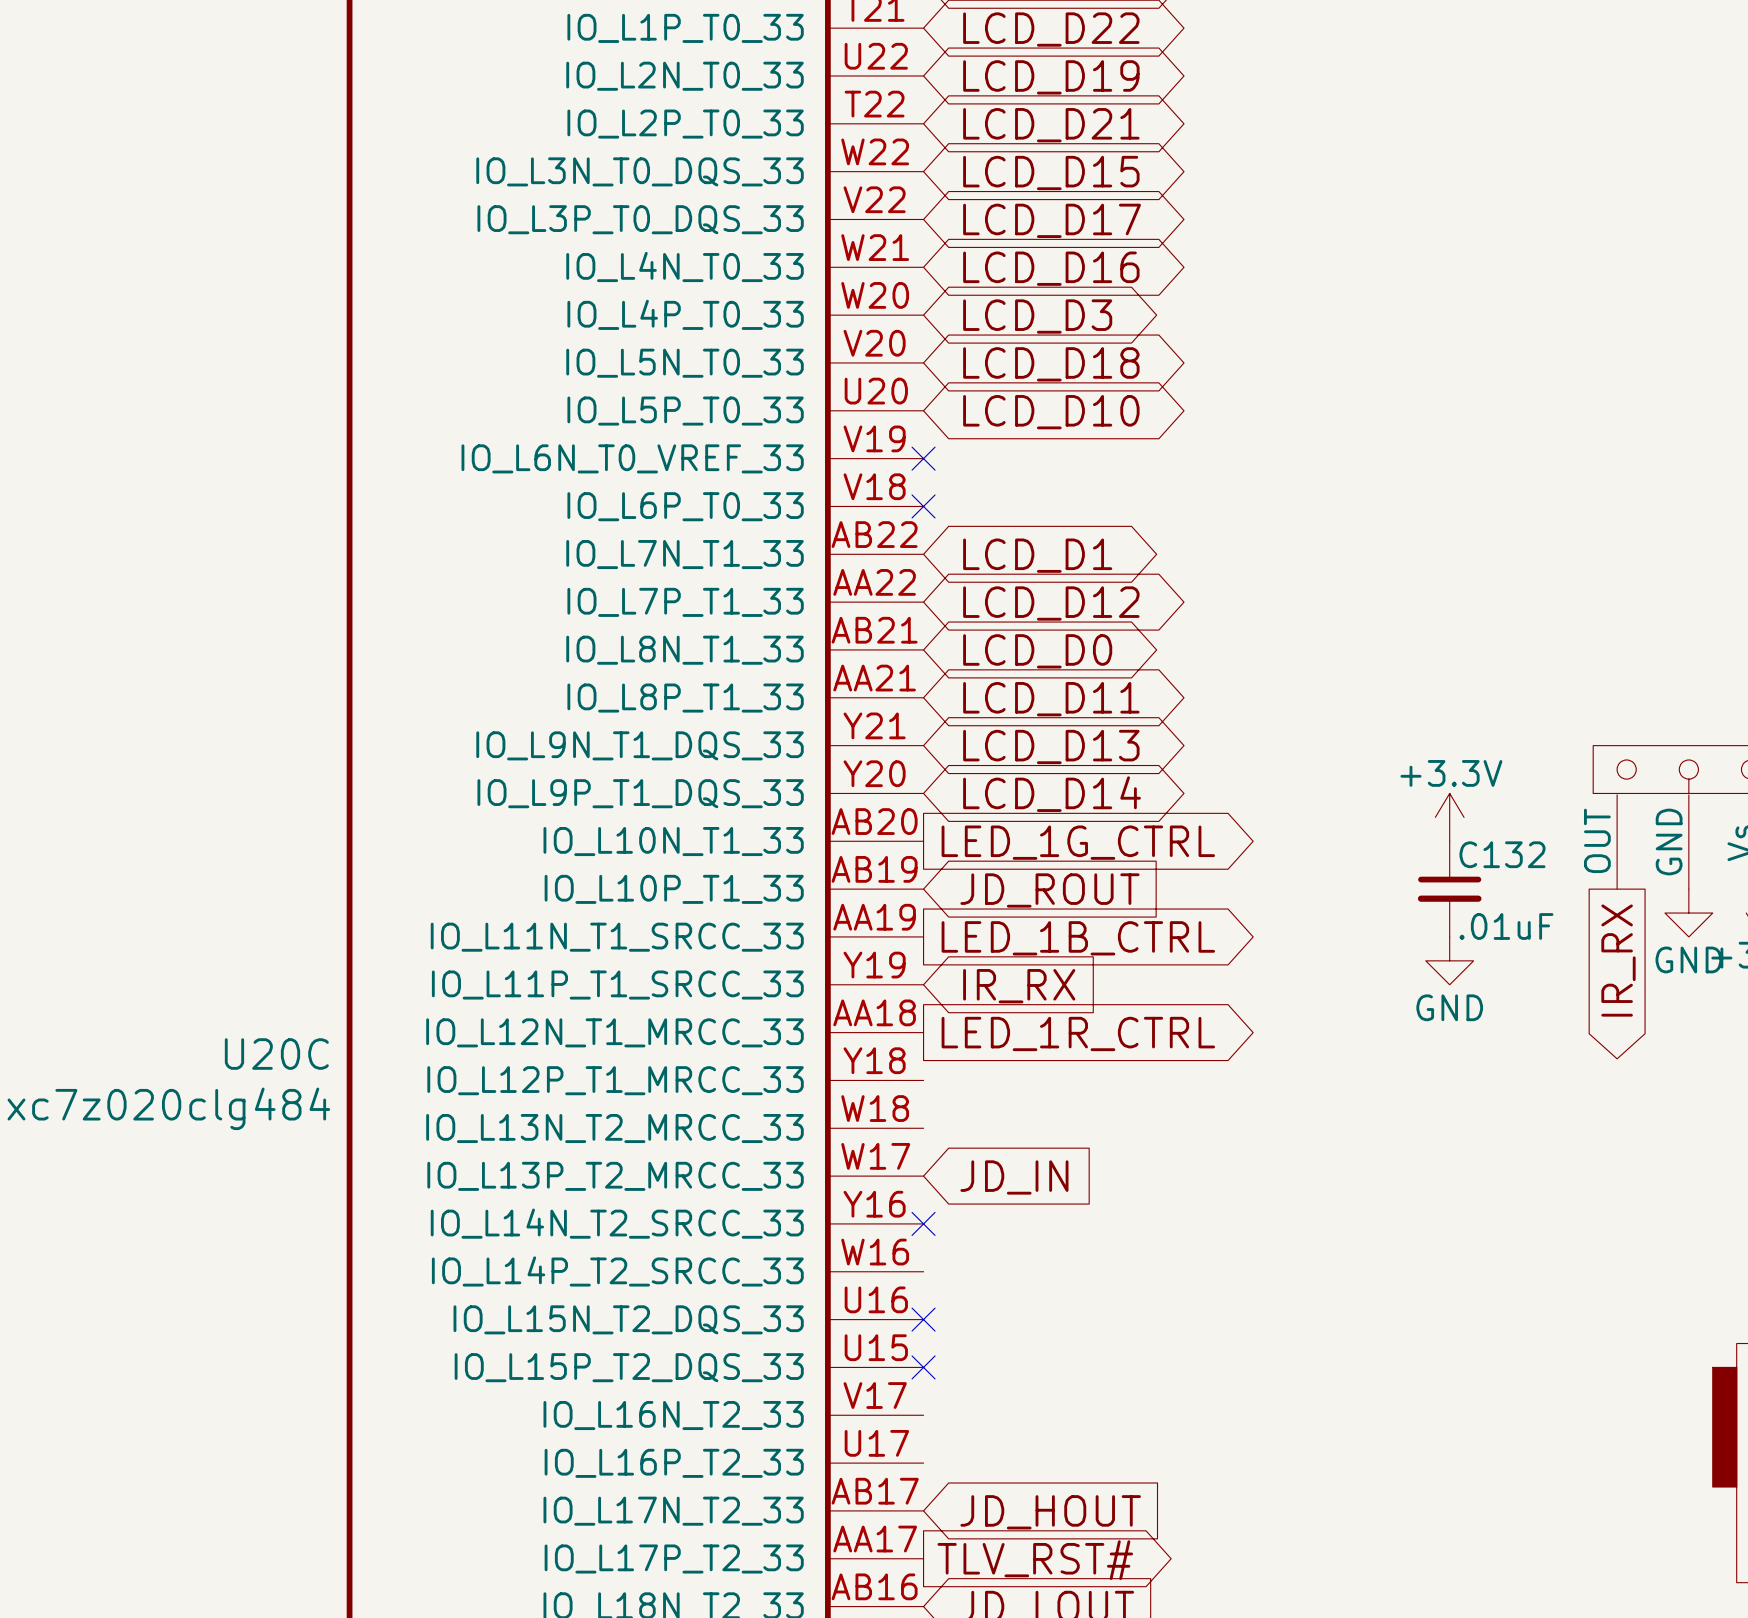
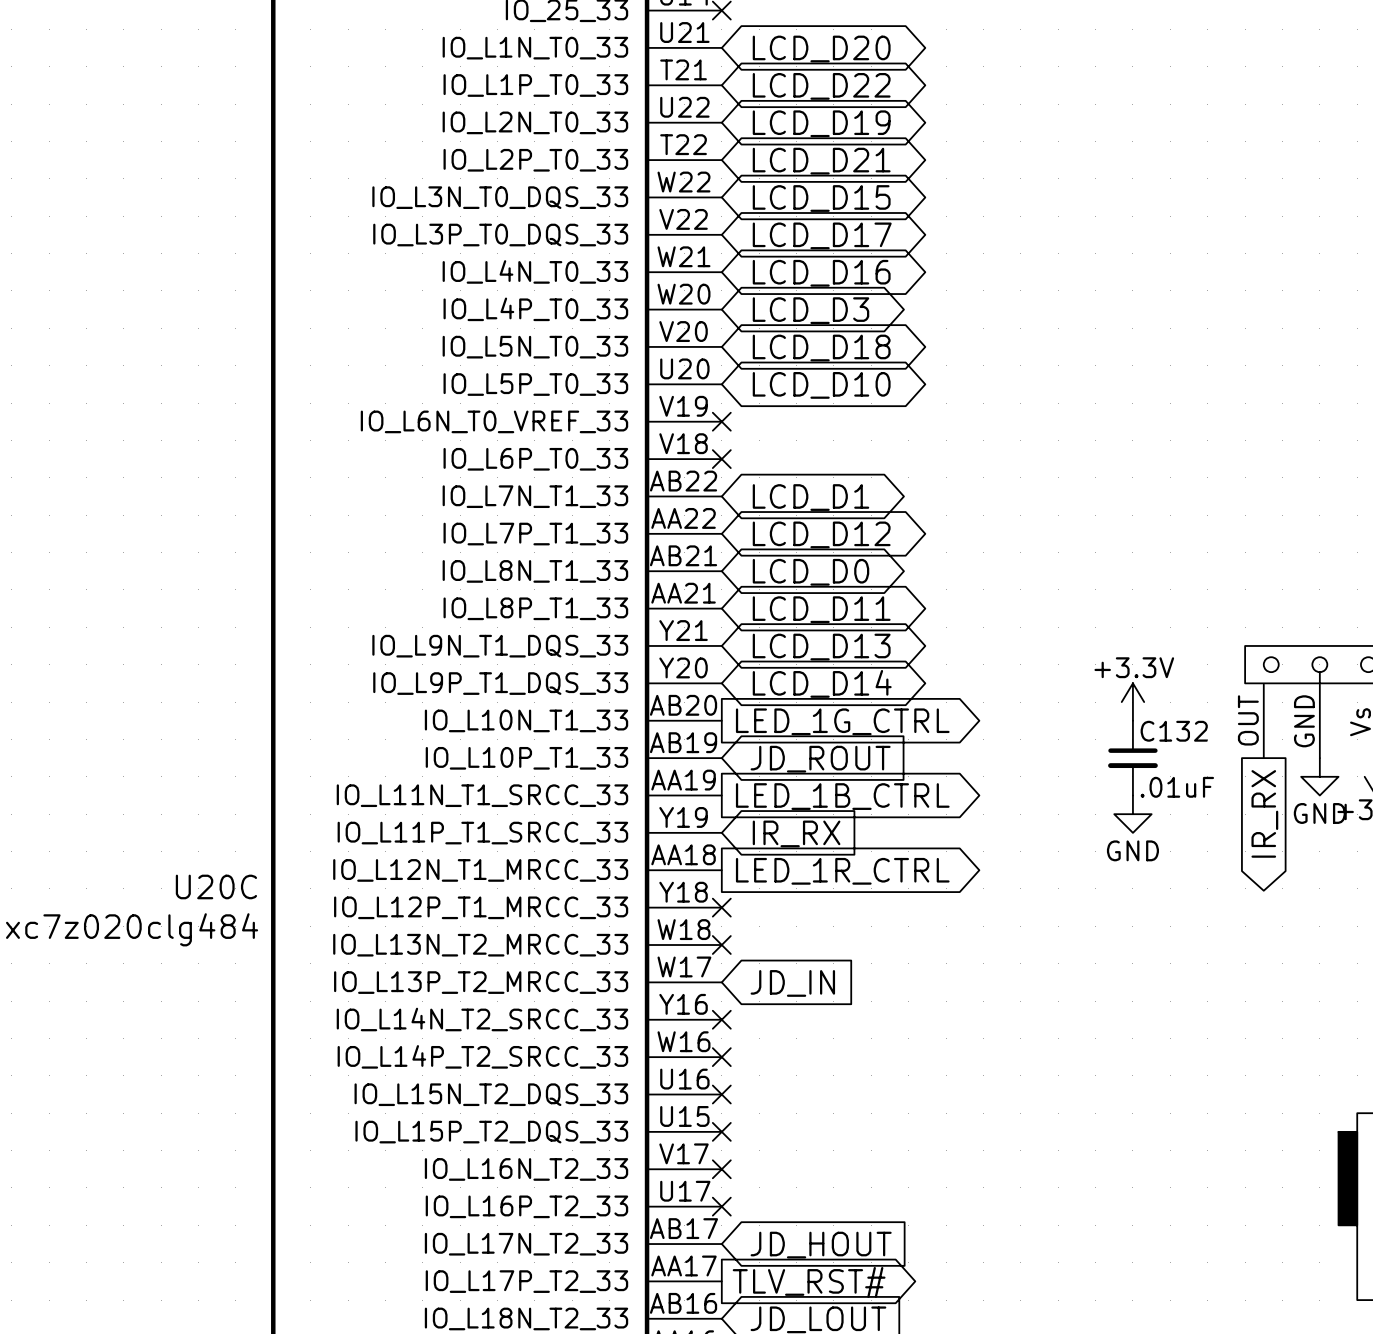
no-connect mark: none -> (721, 907)
no-connect mark: none -> (721, 945)
no-connect mark: none -> (721, 1057)
no-connect mark: none -> (721, 1169)
no-connect mark: none -> (721, 1206)

